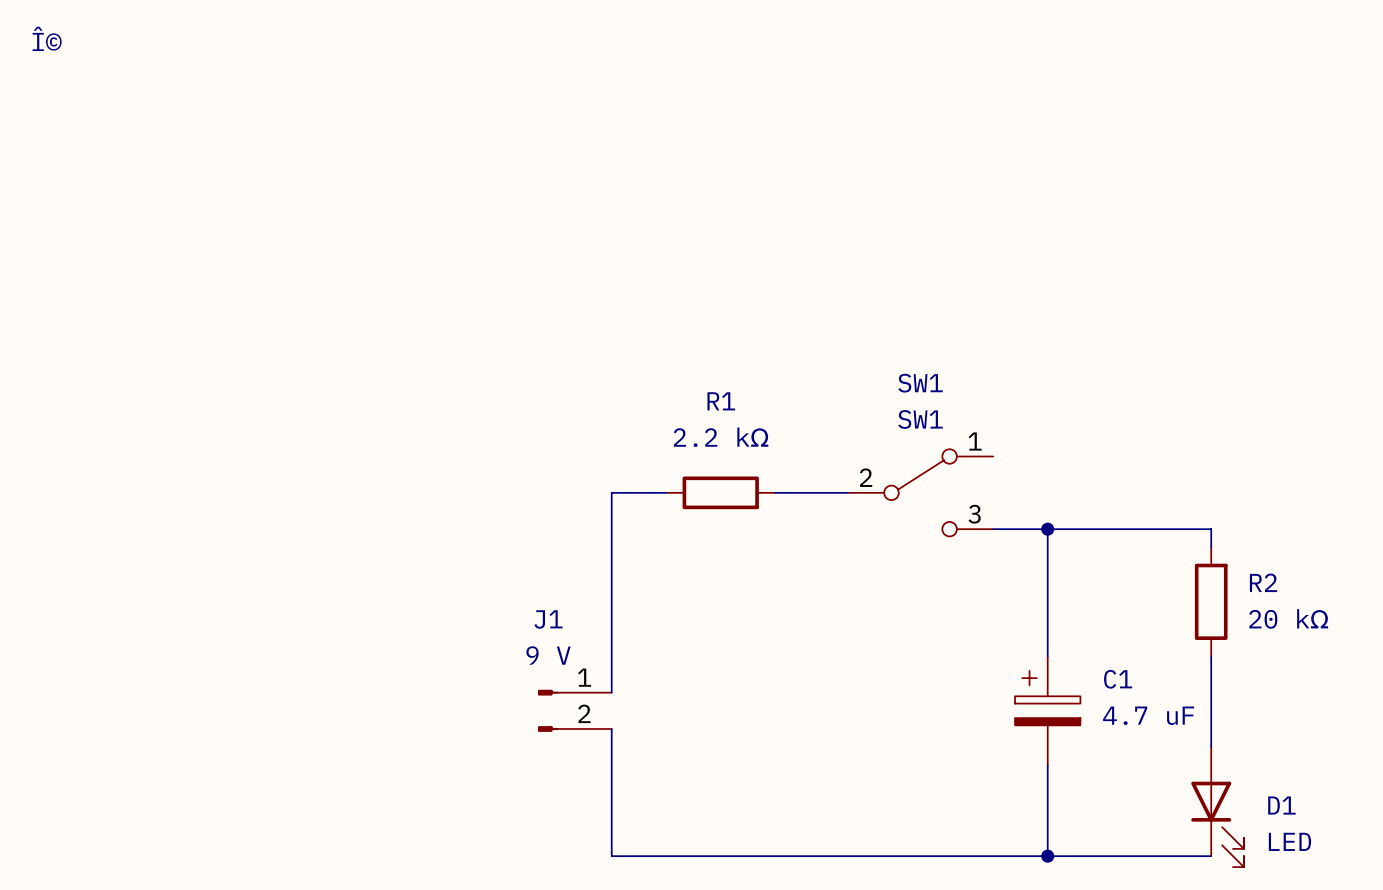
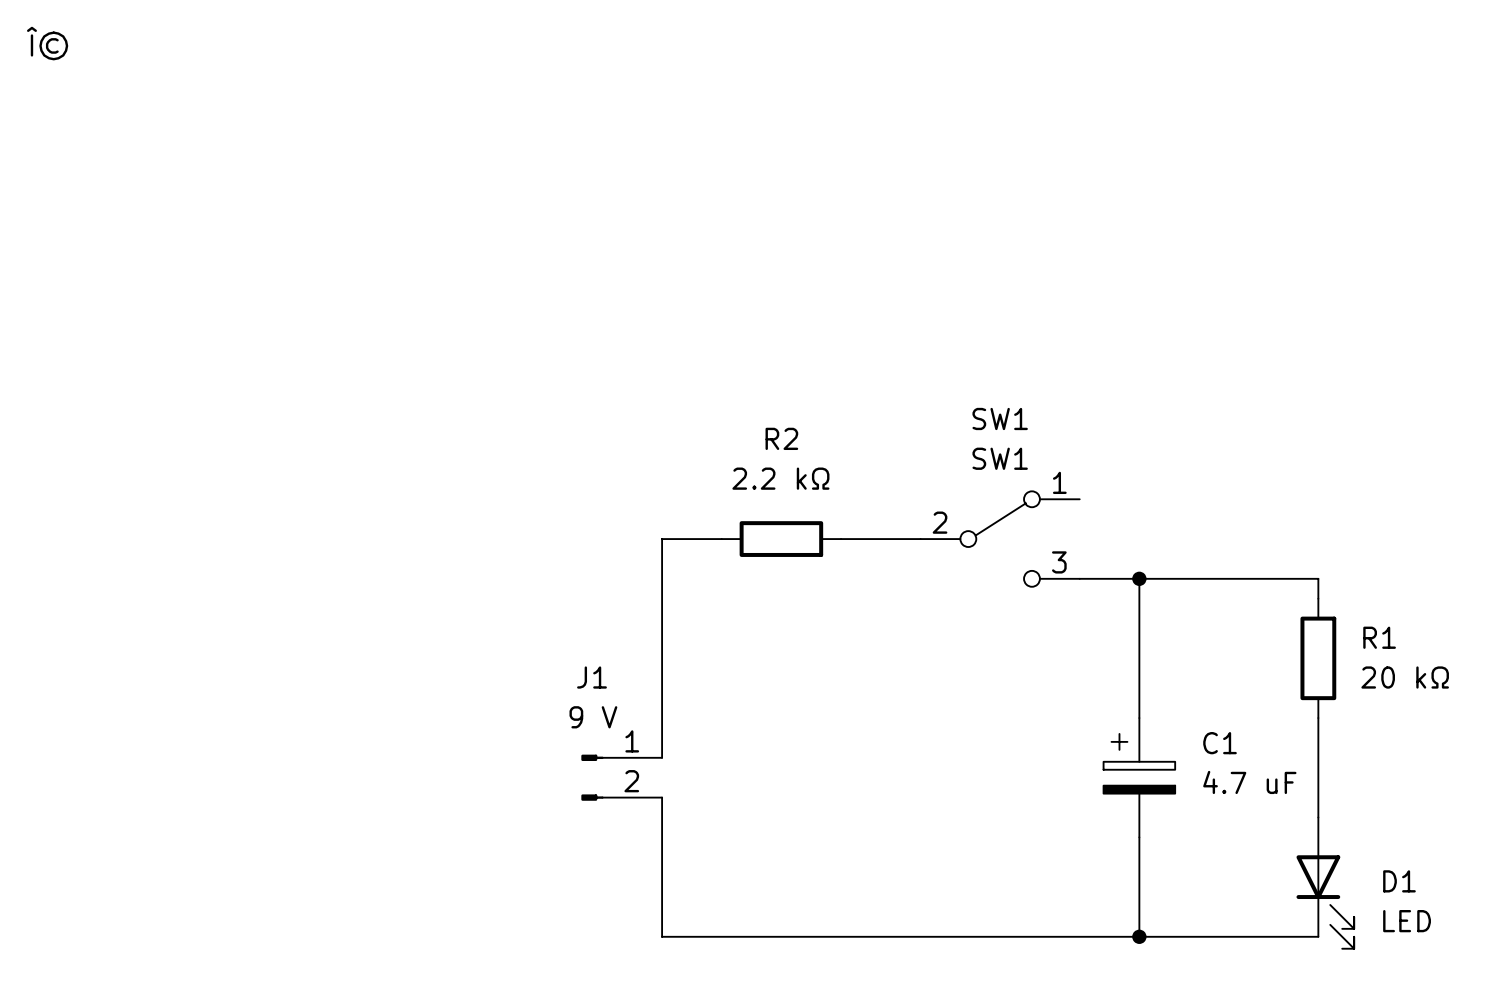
R1 name: R1 (721, 401) -> R2 (781, 438)
R2 name: R2 (1263, 582) -> R1 (1379, 637)

